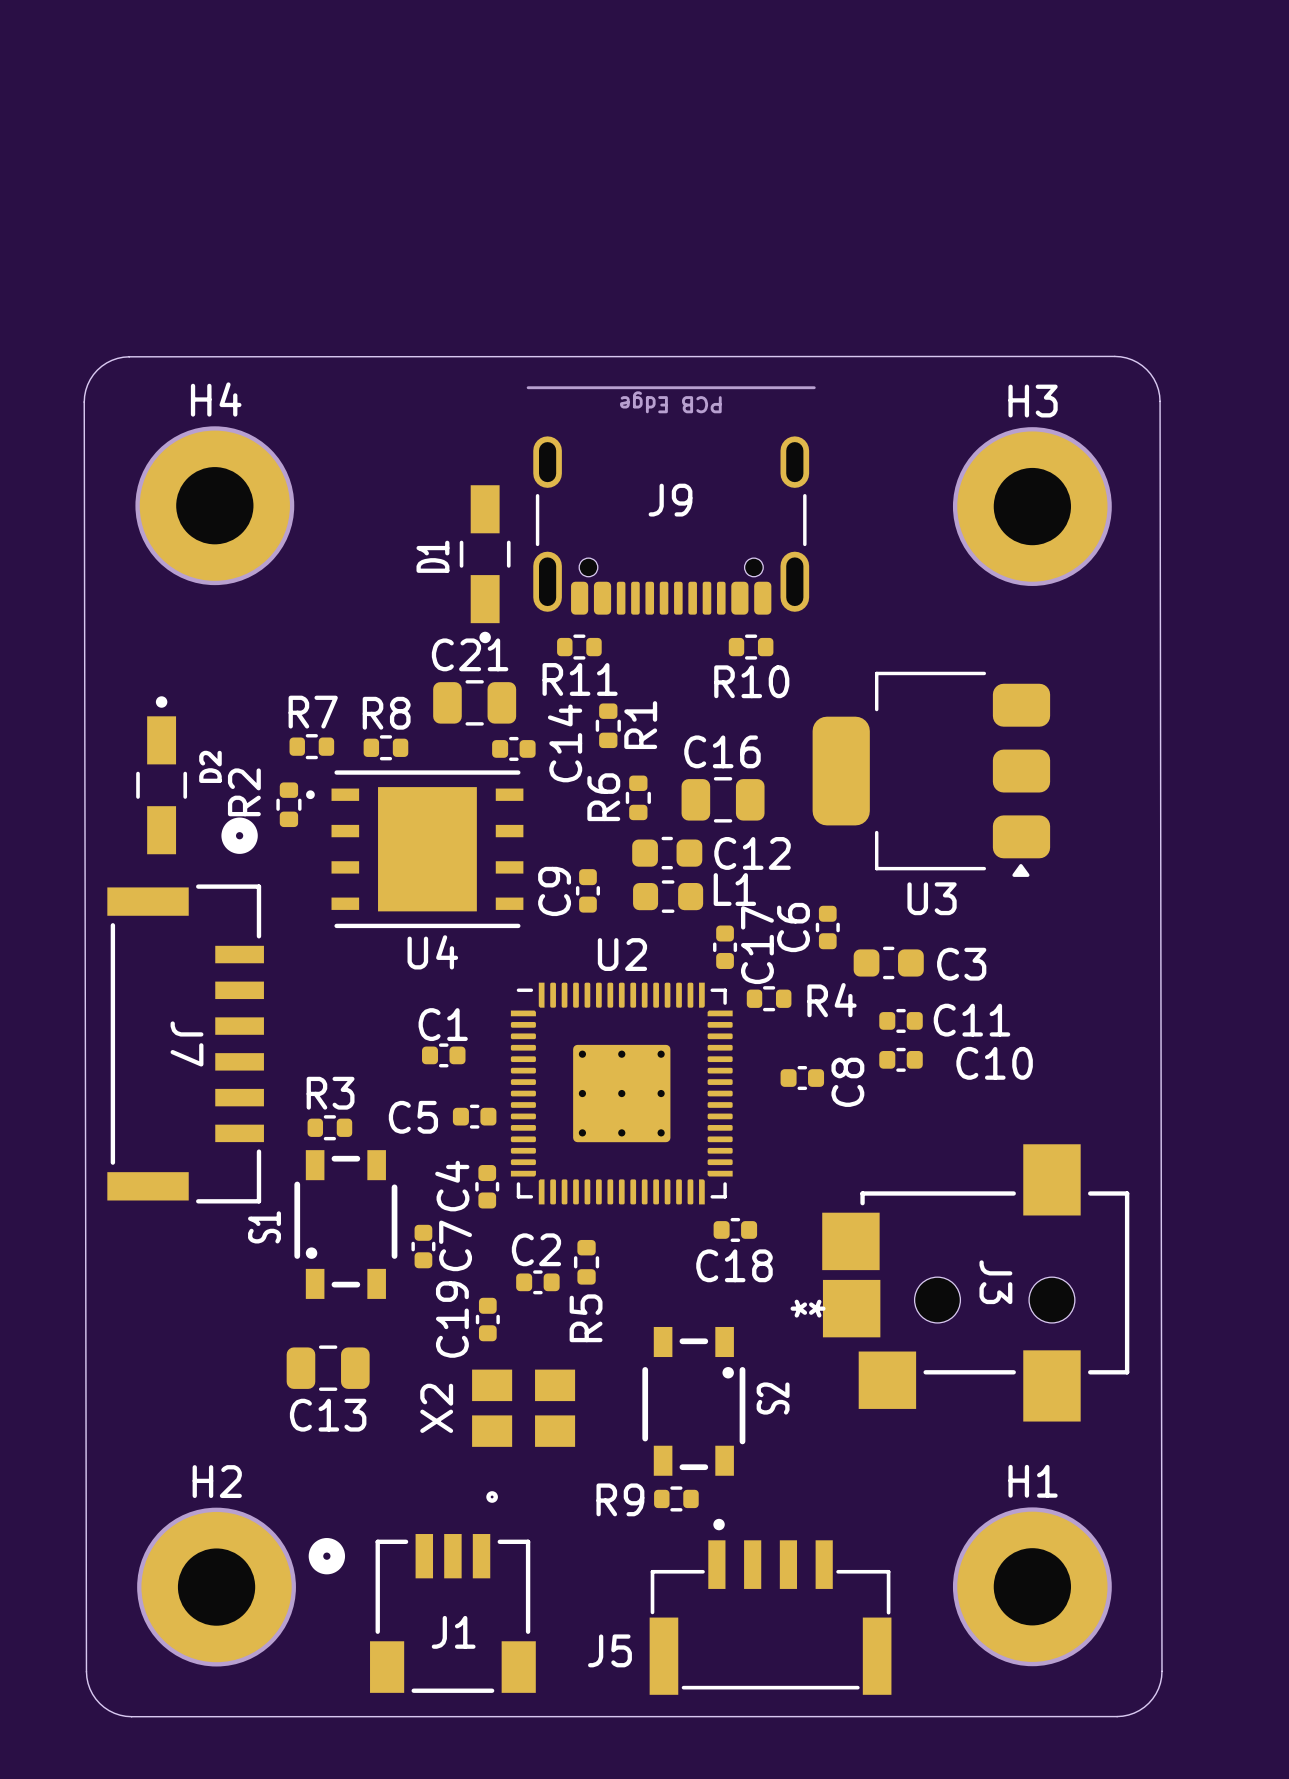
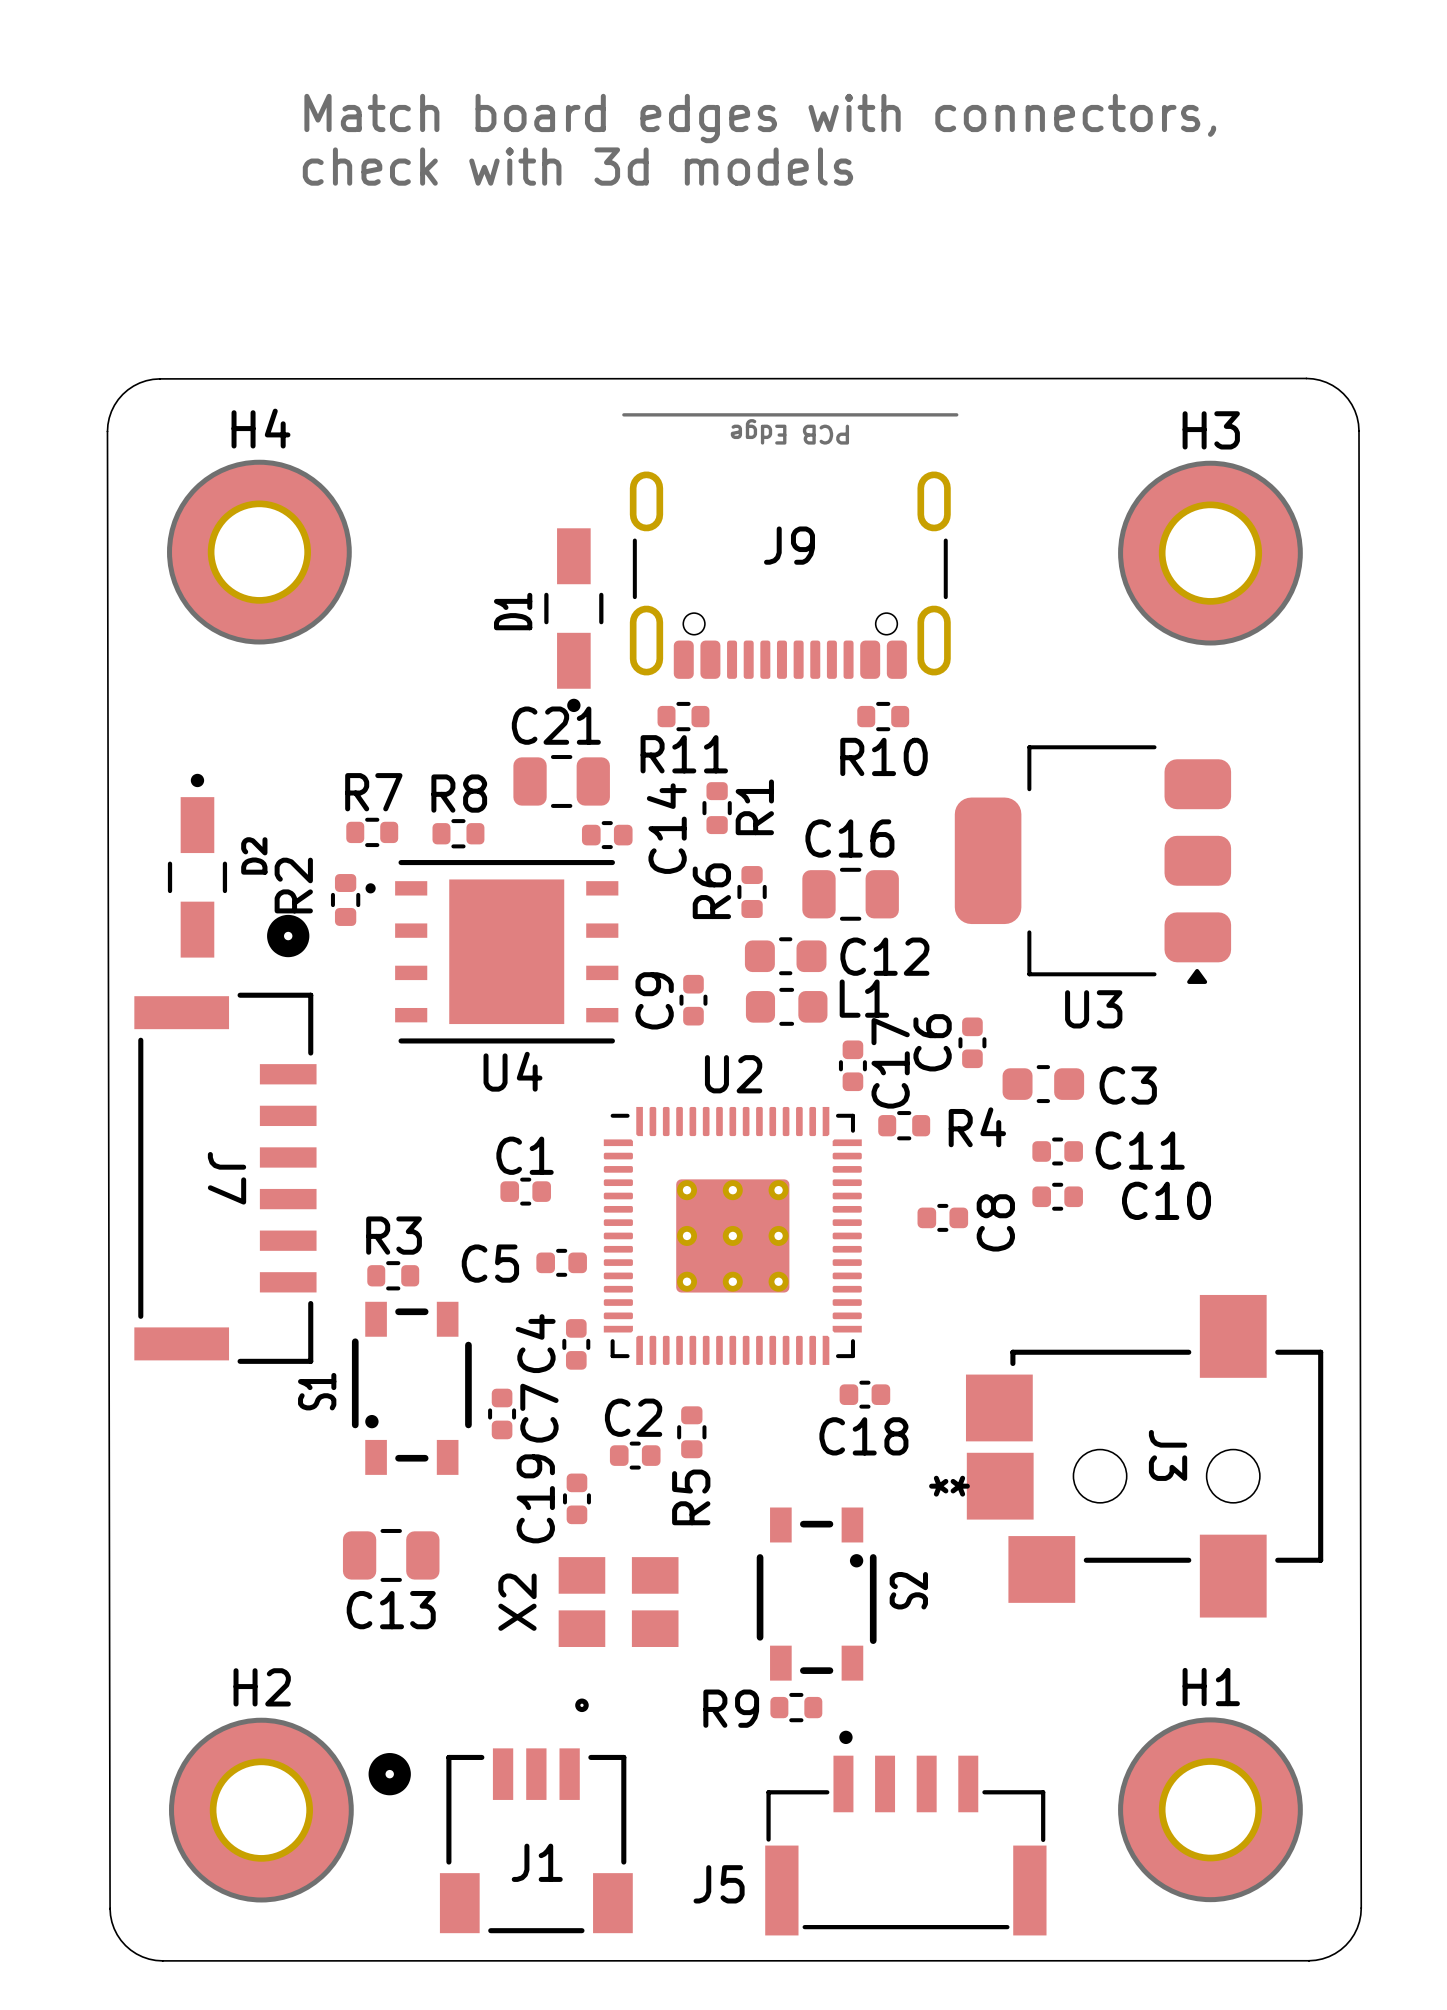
text: none -> Match board edges with connectors, (760, 118)
text: none -> check with 3d models (577, 166)

